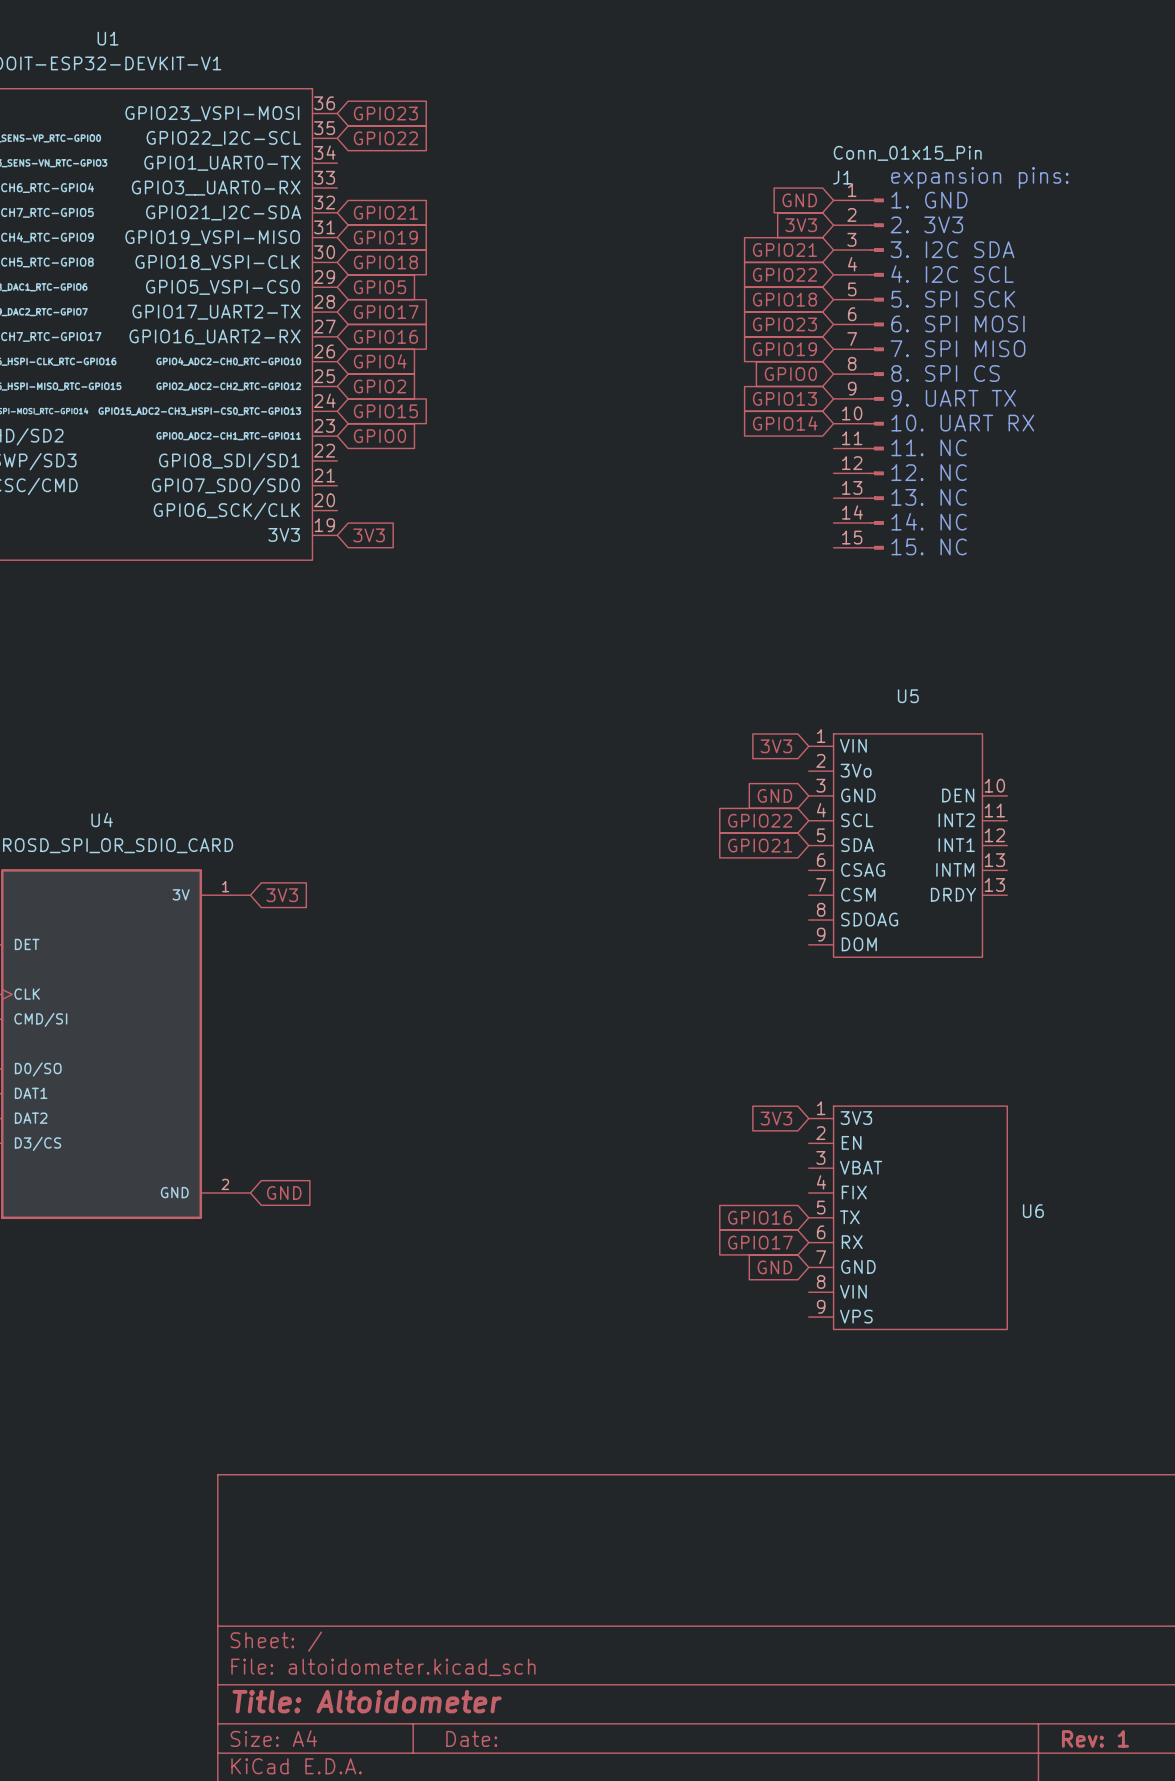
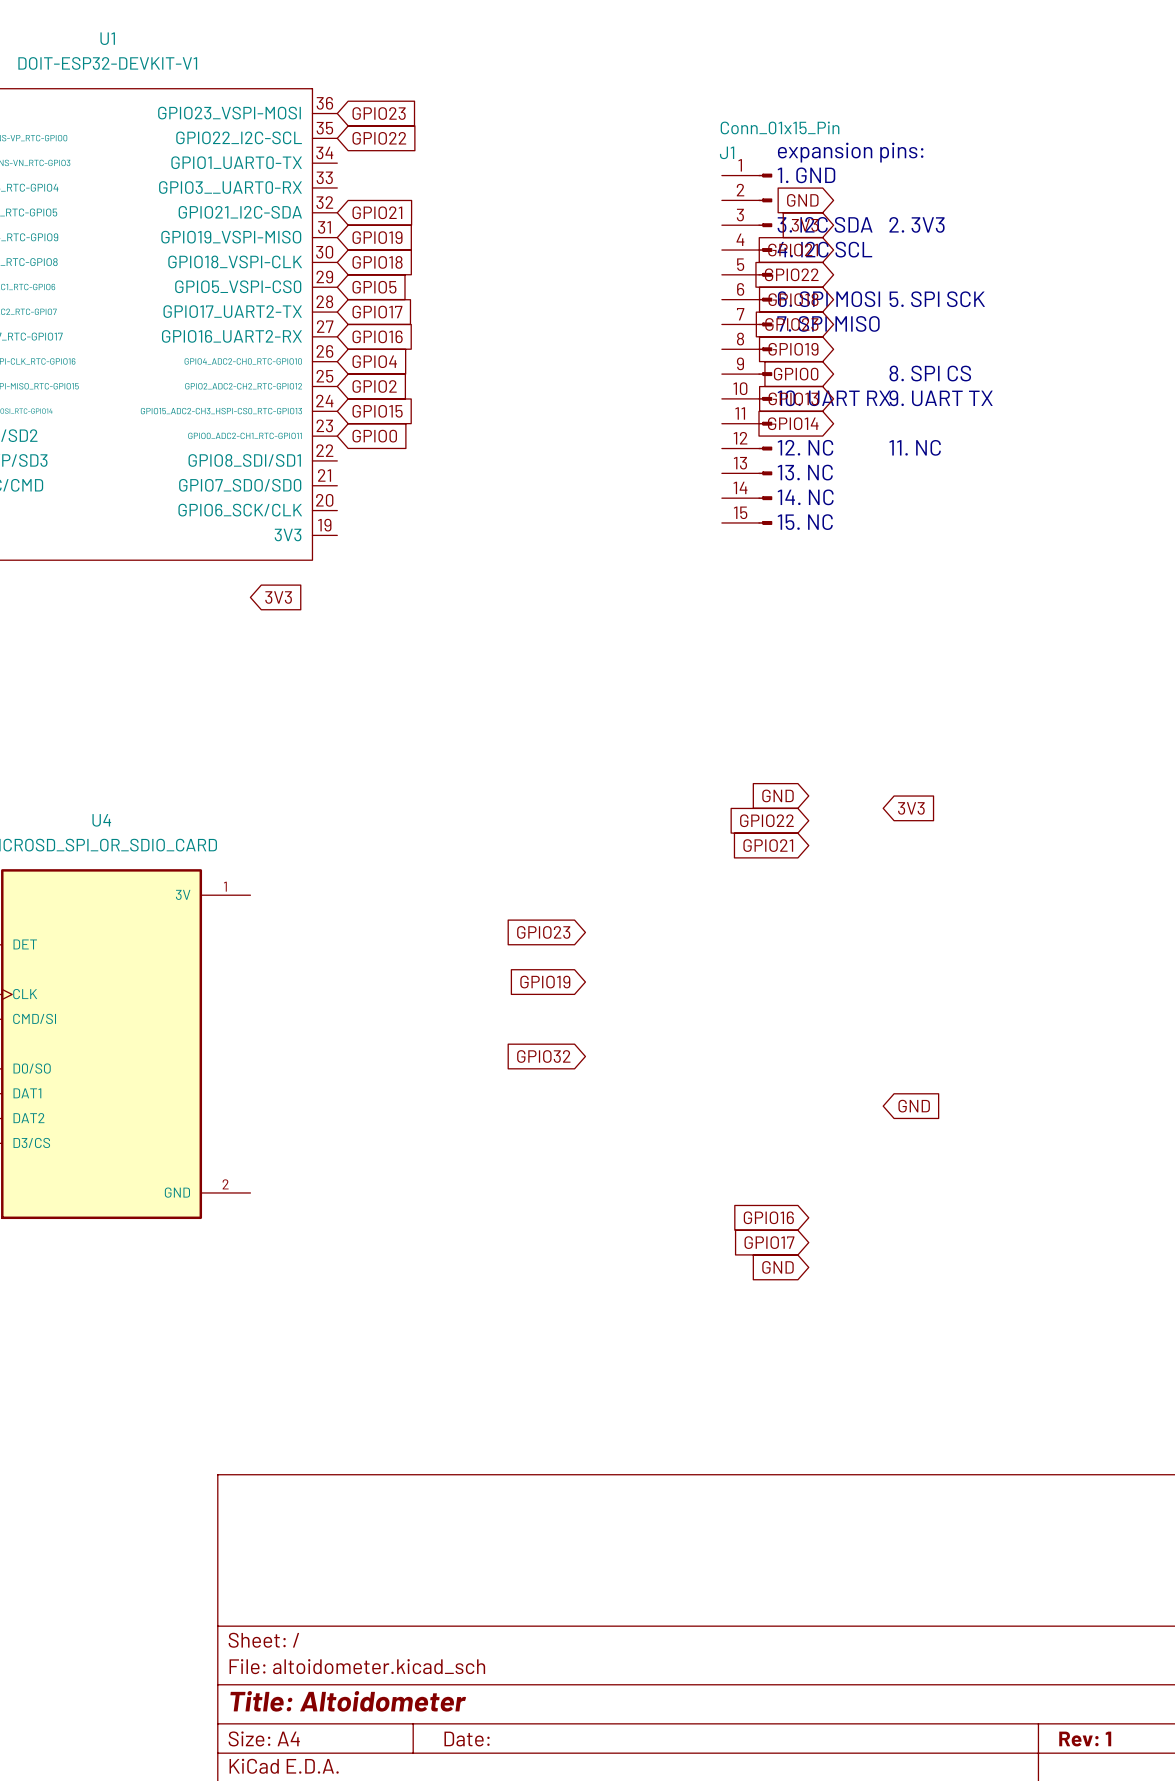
text position: expansion pins: (979, 177) -> expansion pins: (850, 152)
text position: 1. GND (929, 200) -> 1. GND (806, 175)
text position: 3. I2C SDA (952, 249) -> 3. I2C SDA (825, 224)
text position: 4. I2C SCL (952, 274) -> 4. I2C SCL (824, 249)
text position: 6. SPI MOSI (958, 323) -> 6. SPI MOSI (829, 299)
text position: 7. SPI MISO (958, 348) -> 7. SPI MISO (828, 323)
J1 position: (858, 374) -> (747, 349)
text position: 10. UART RX (962, 423) -> 10. UART RX (834, 398)
text position: 12. NC (929, 472) -> 12. NC (805, 447)
text position: 13. NC (929, 497) -> 13. NC (805, 472)
text position: 14. NC (929, 521) -> 14. NC (805, 497)
global label position: 3V3 (369, 535) -> 3V3 (278, 597)
text position: 15. NC (929, 546) -> 15. NC (805, 522)
global label rotation: 0° (776, 746) -> 180° (911, 808)
global label position: 3V3 (776, 746) -> 3V3 (911, 808)
U5: (908, 845) -> none
global label: 3V3 (282, 895) -> none
global label: none -> GPIO23 (543, 932)
global label: none -> GPIO19 (545, 982)
global label: none -> GPIO32 (543, 1056)
global label: none -> GND (914, 1106)
global label: 3V3 (776, 1118) -> none
global label: GND (284, 1192) -> none
U6: (908, 1217) -> none

